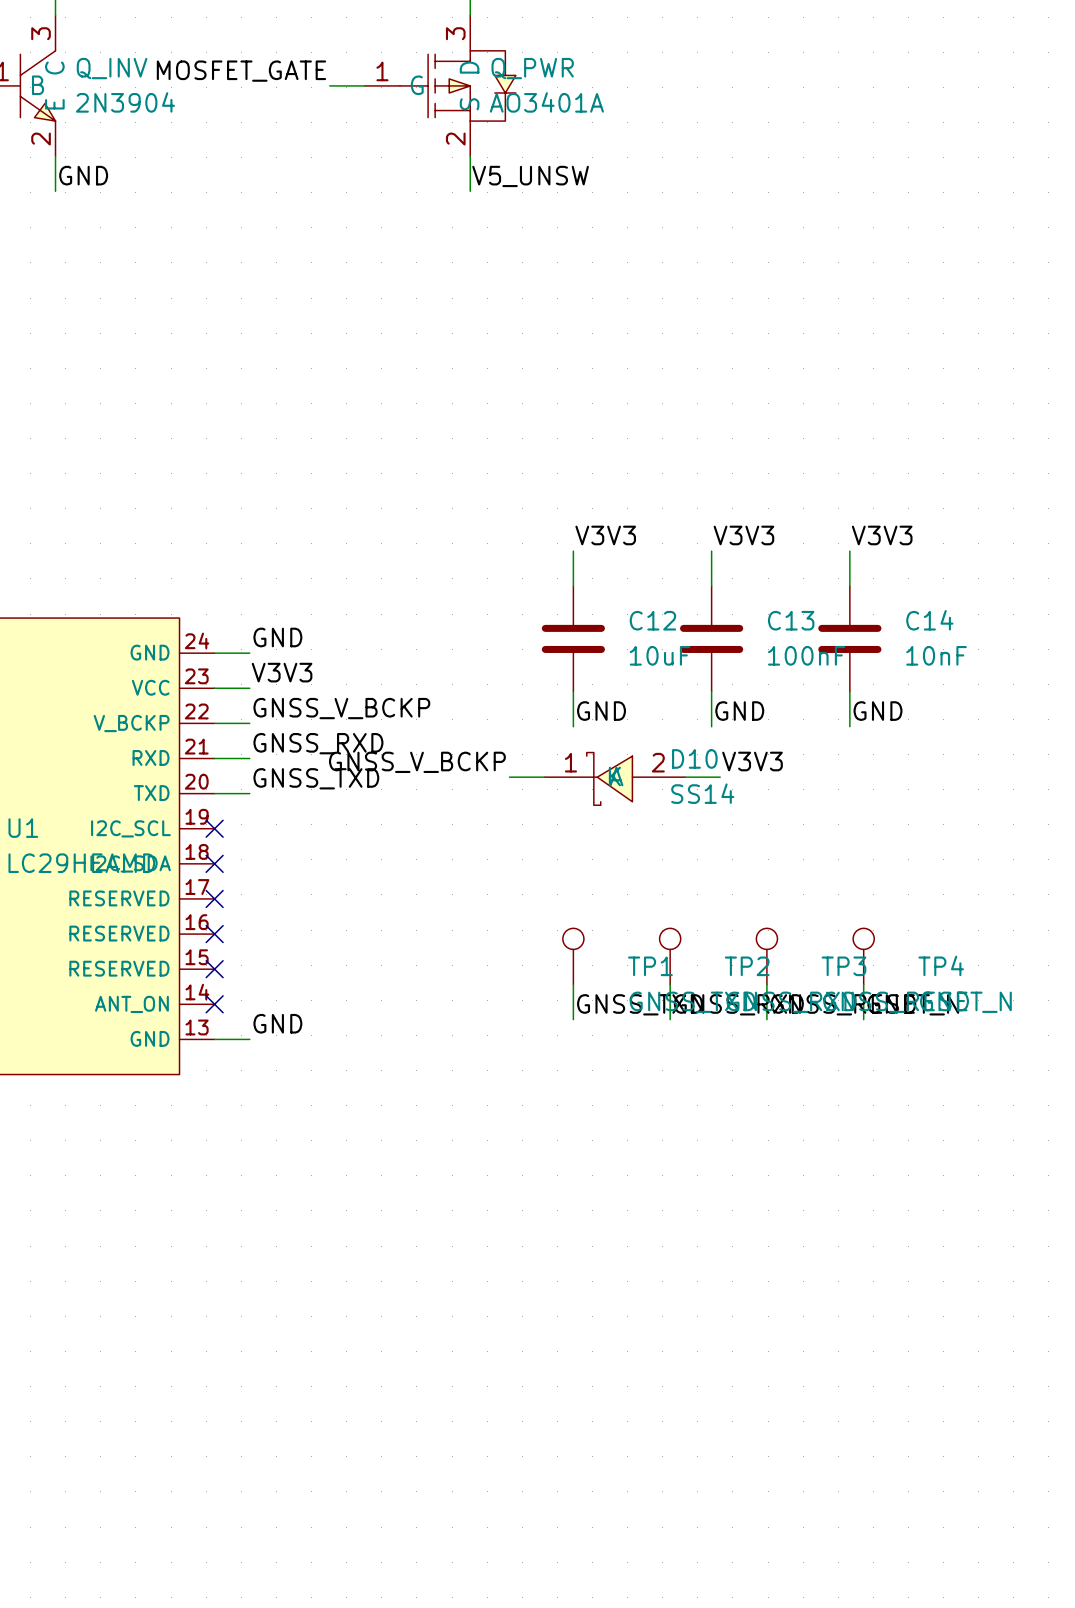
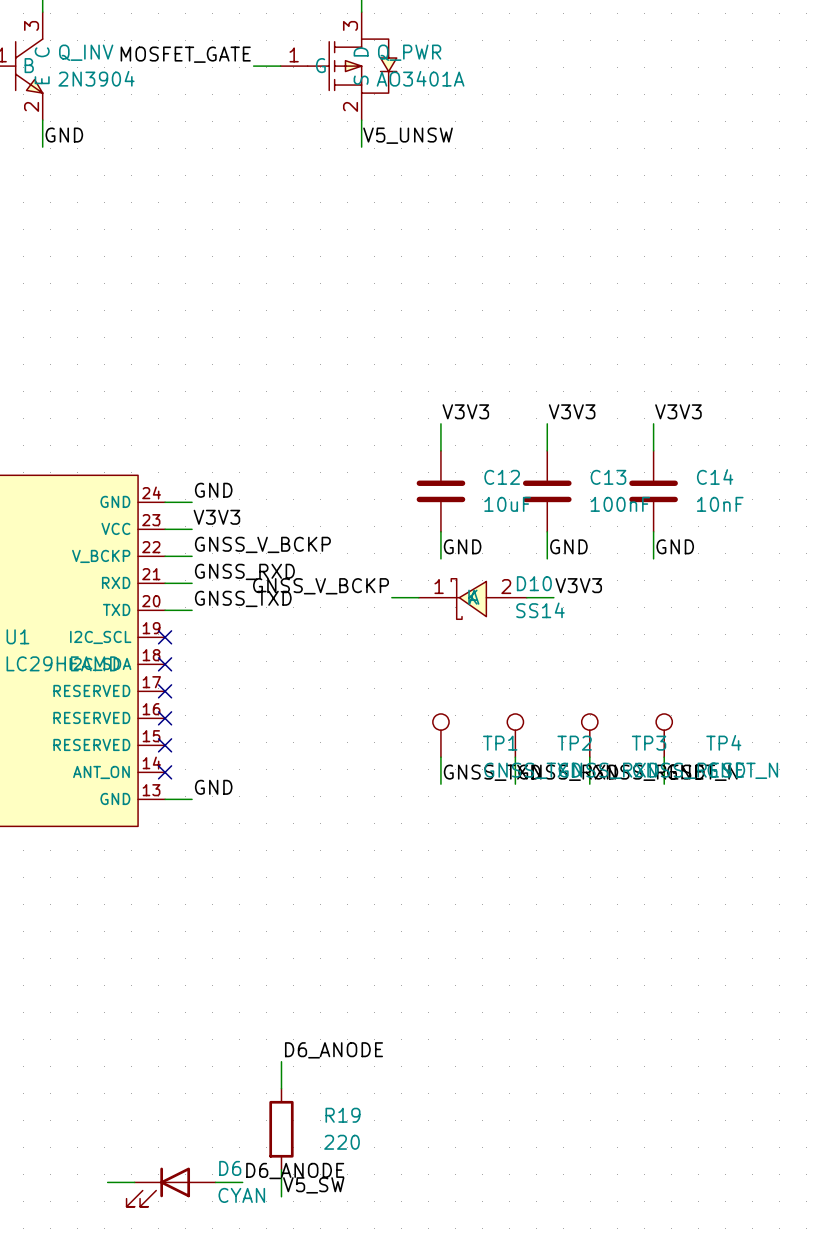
label: none -> D6_ANODE (333, 1050)
wire: none -> (281, 1061) (281, 1088)
R19: none -> 220 (281, 1129)
wire: none -> (281, 1169) (281, 1196)
label: none -> D6_ANODE (295, 1171)
wire: none -> (107, 1182) (134, 1182)
wire: none -> (215, 1182) (242, 1182)
label: none -> V5_SW (313, 1185)
D6: none -> CYAN (171, 1187)

